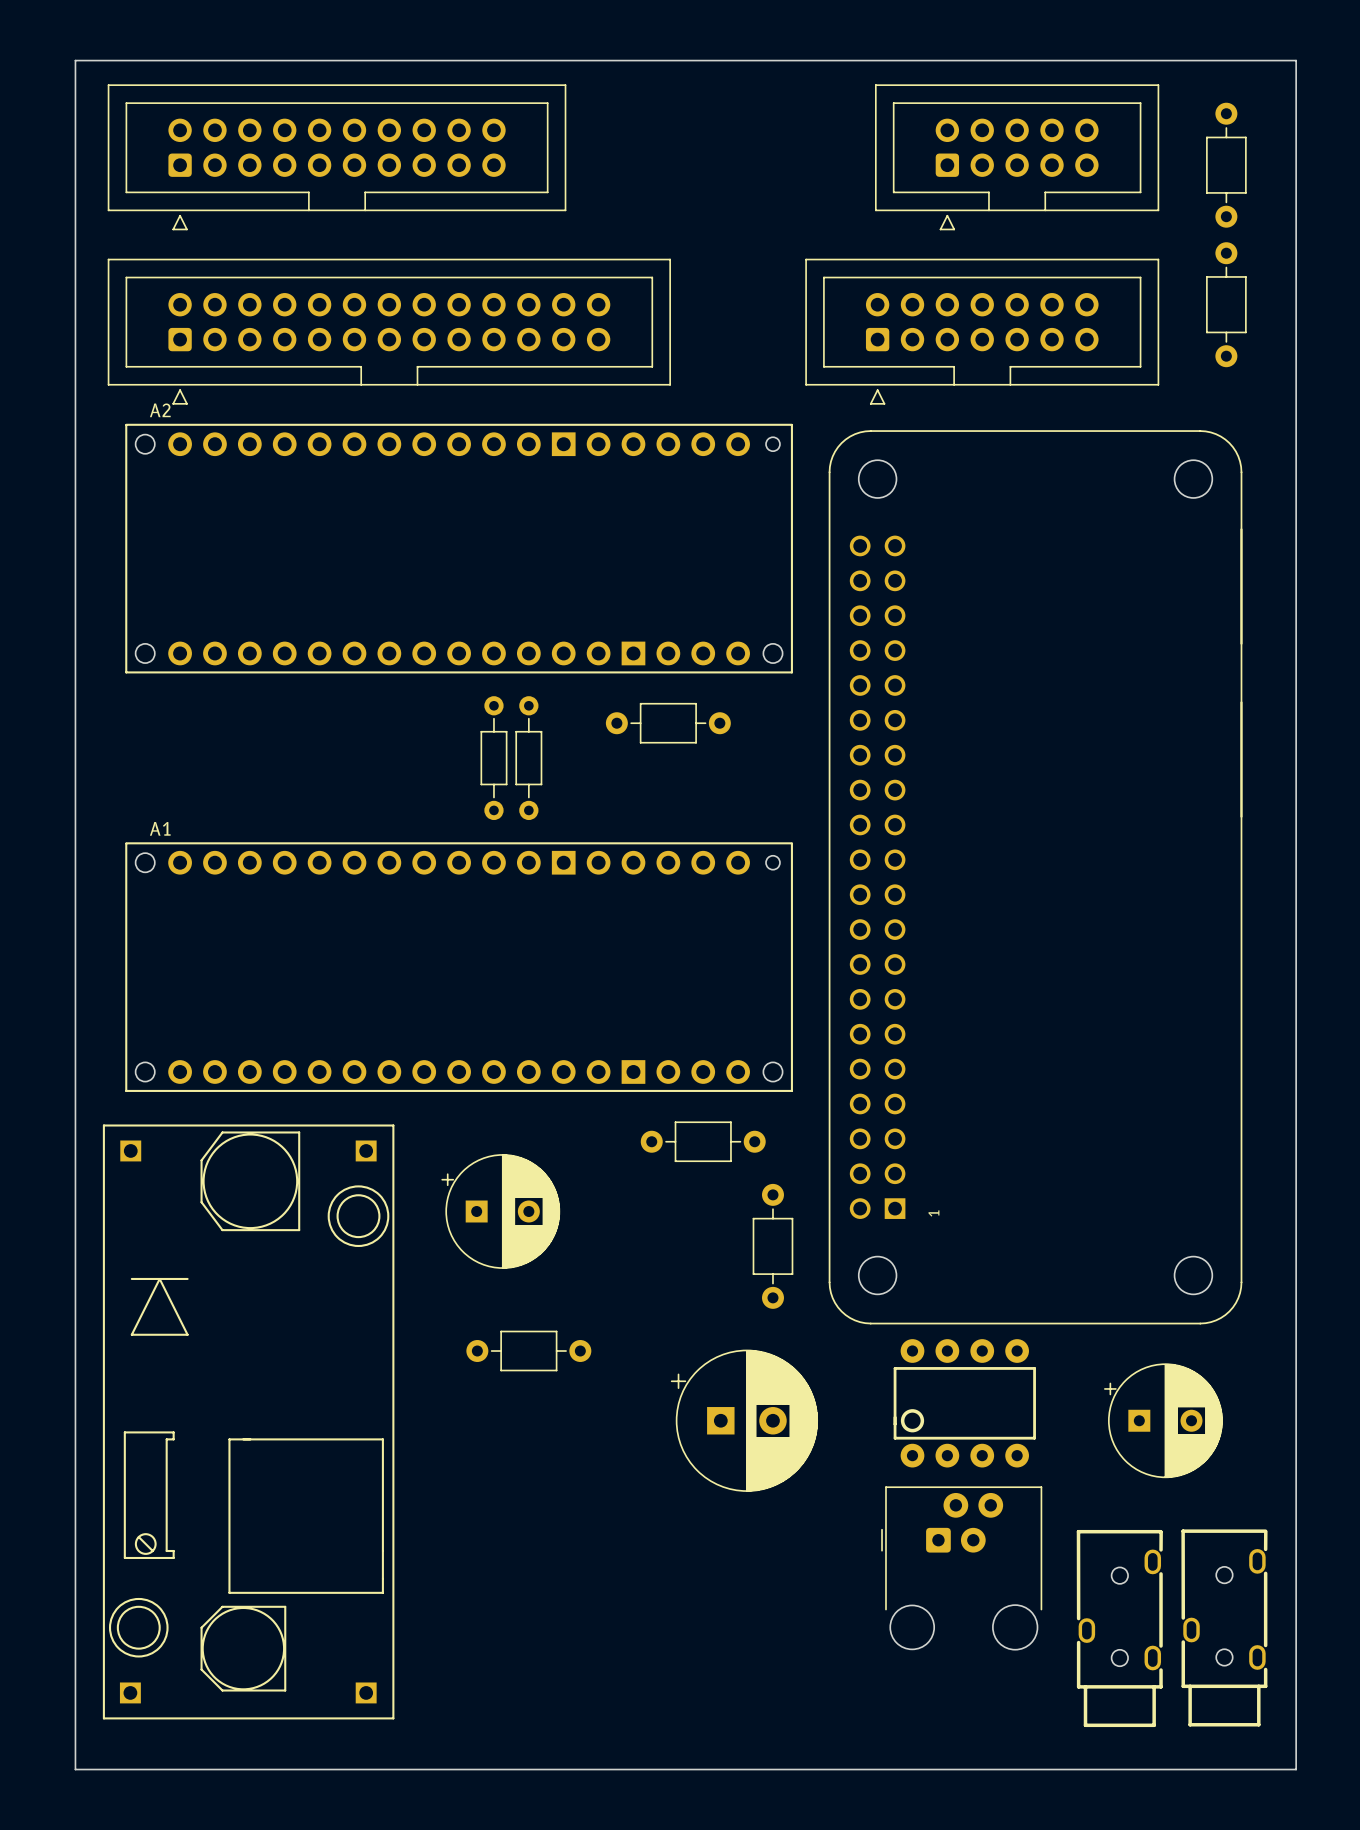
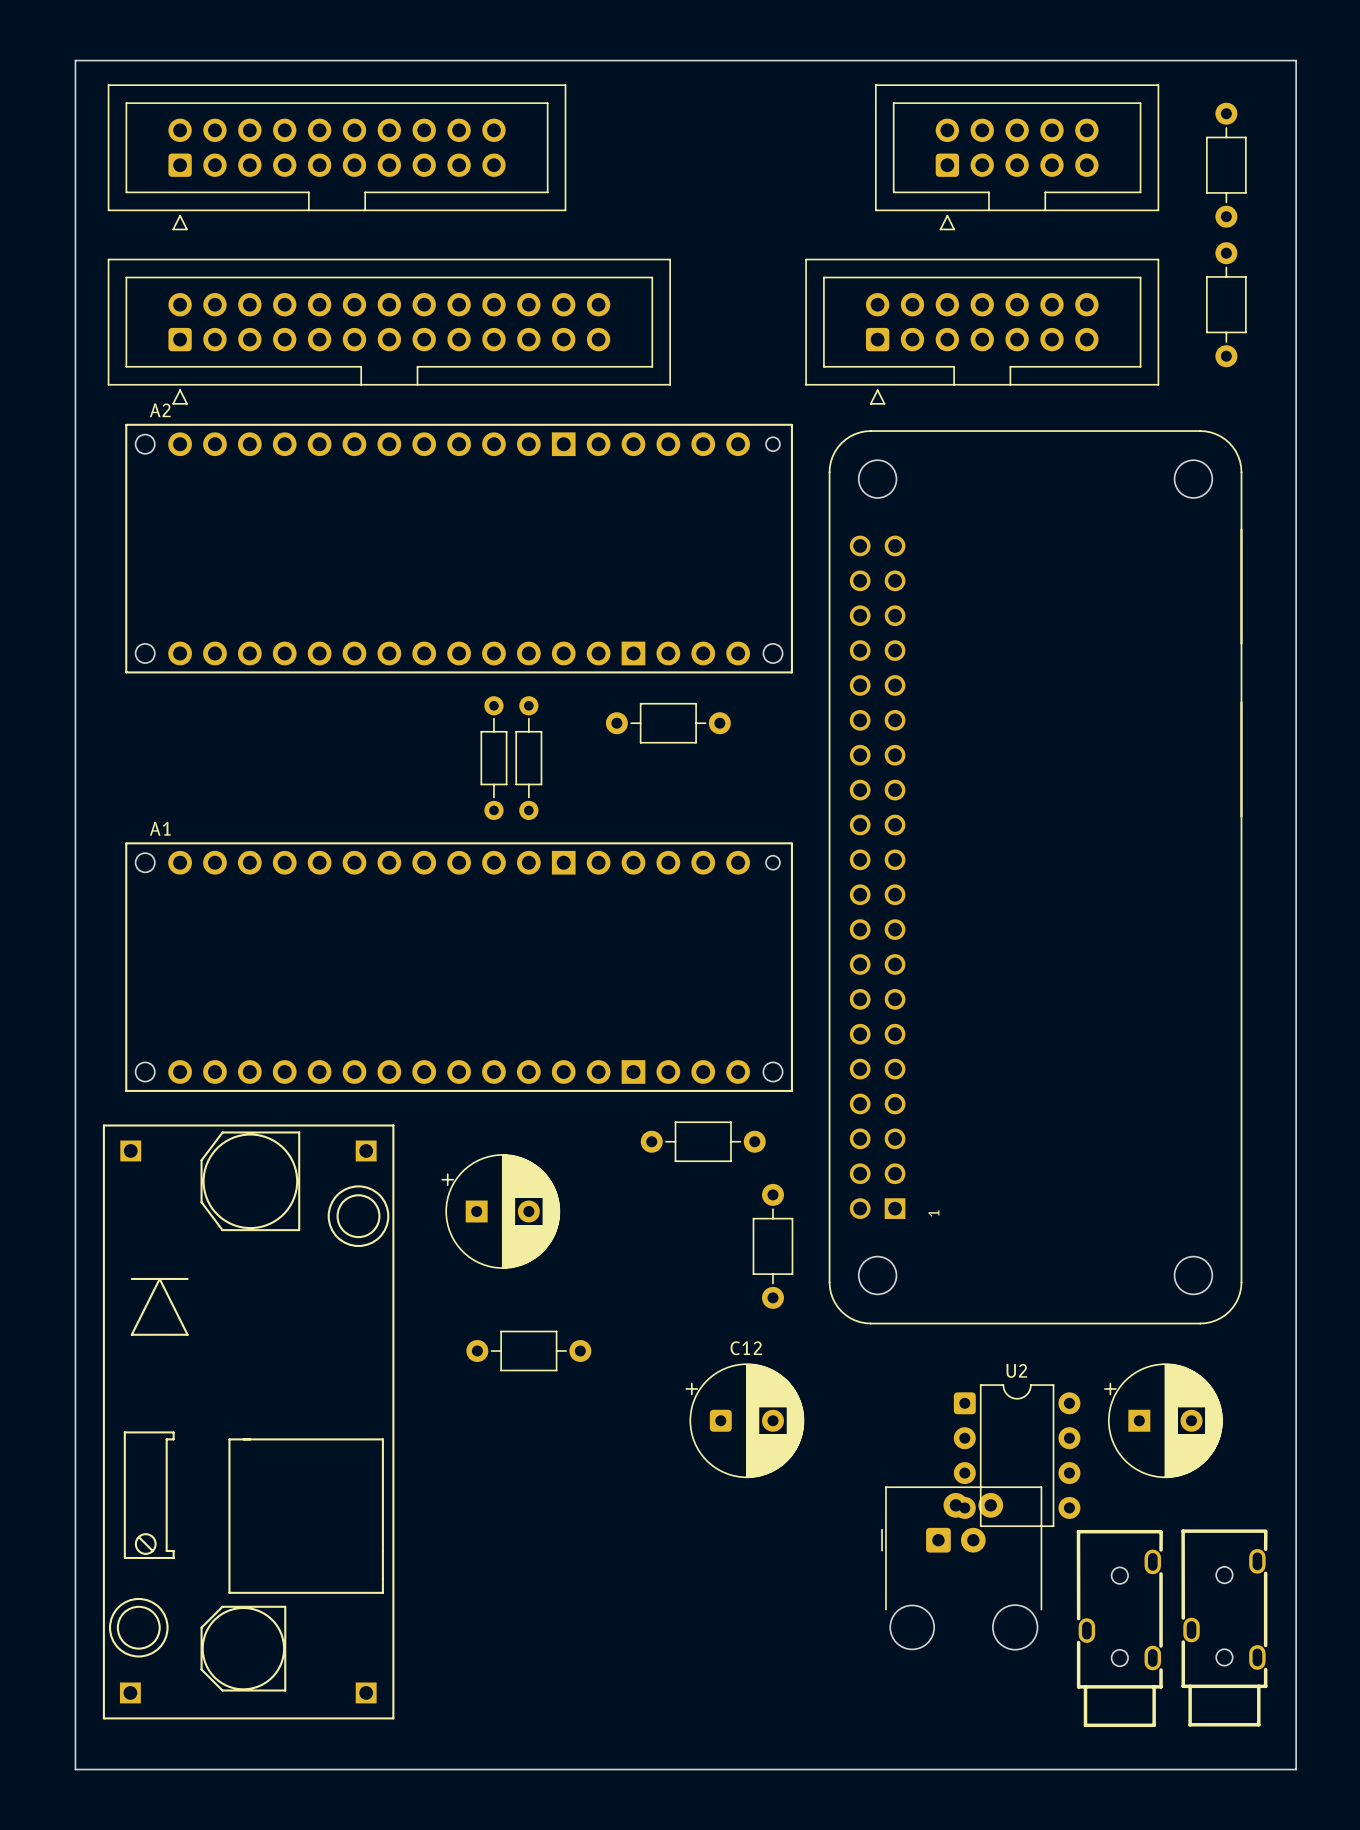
part: (964, 1403) -> none
part: (744, 1420) -> none
C12: none -> (744, 1420)
U2: none -> (1017, 1455)

